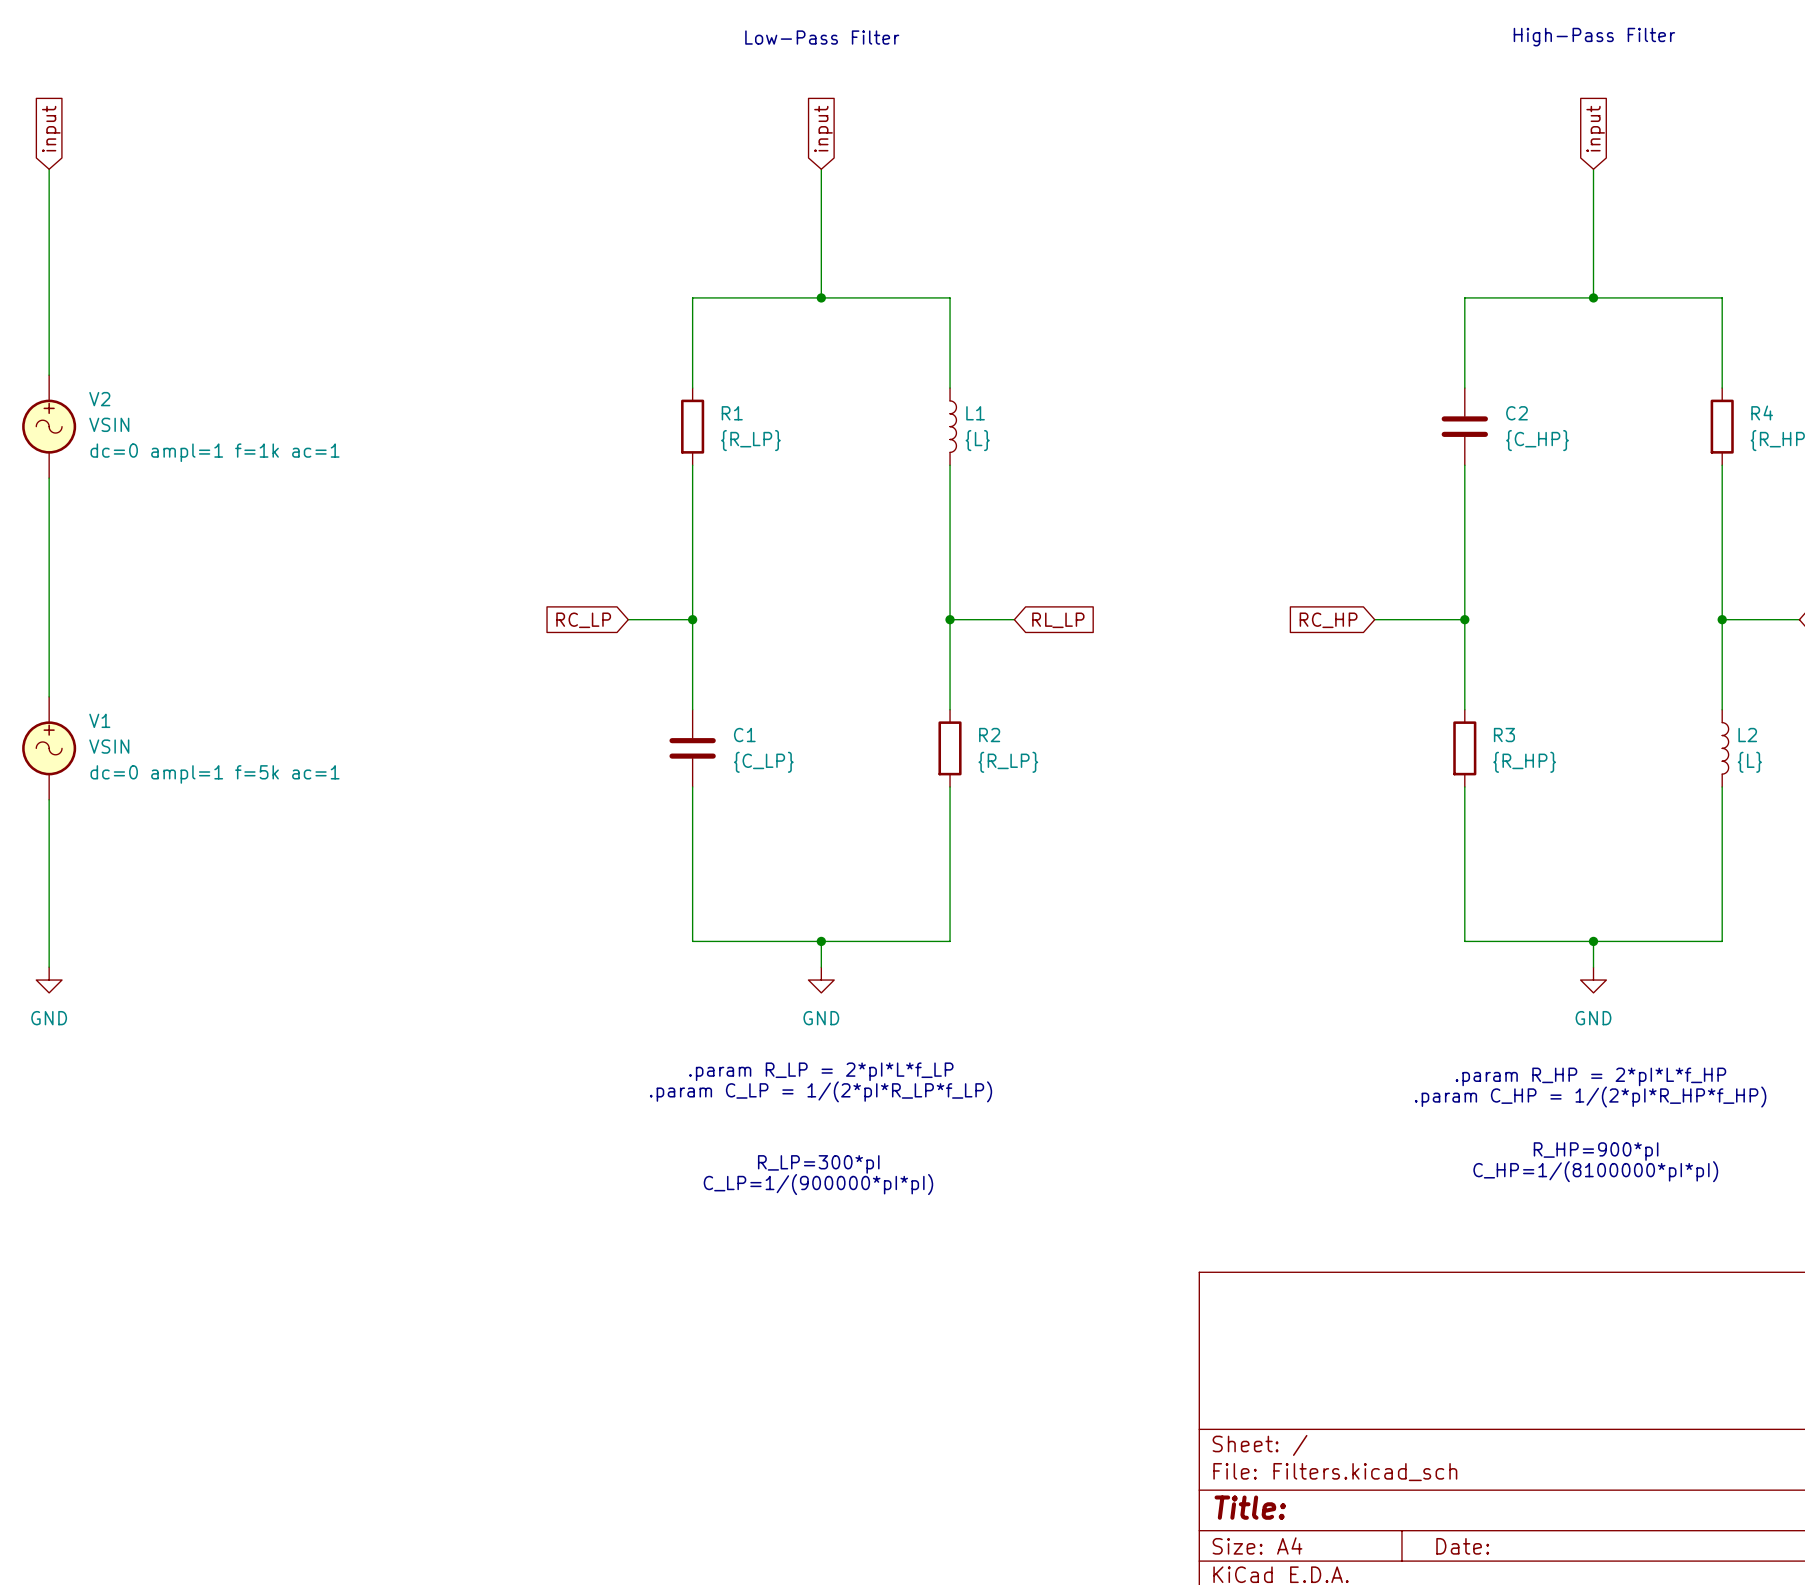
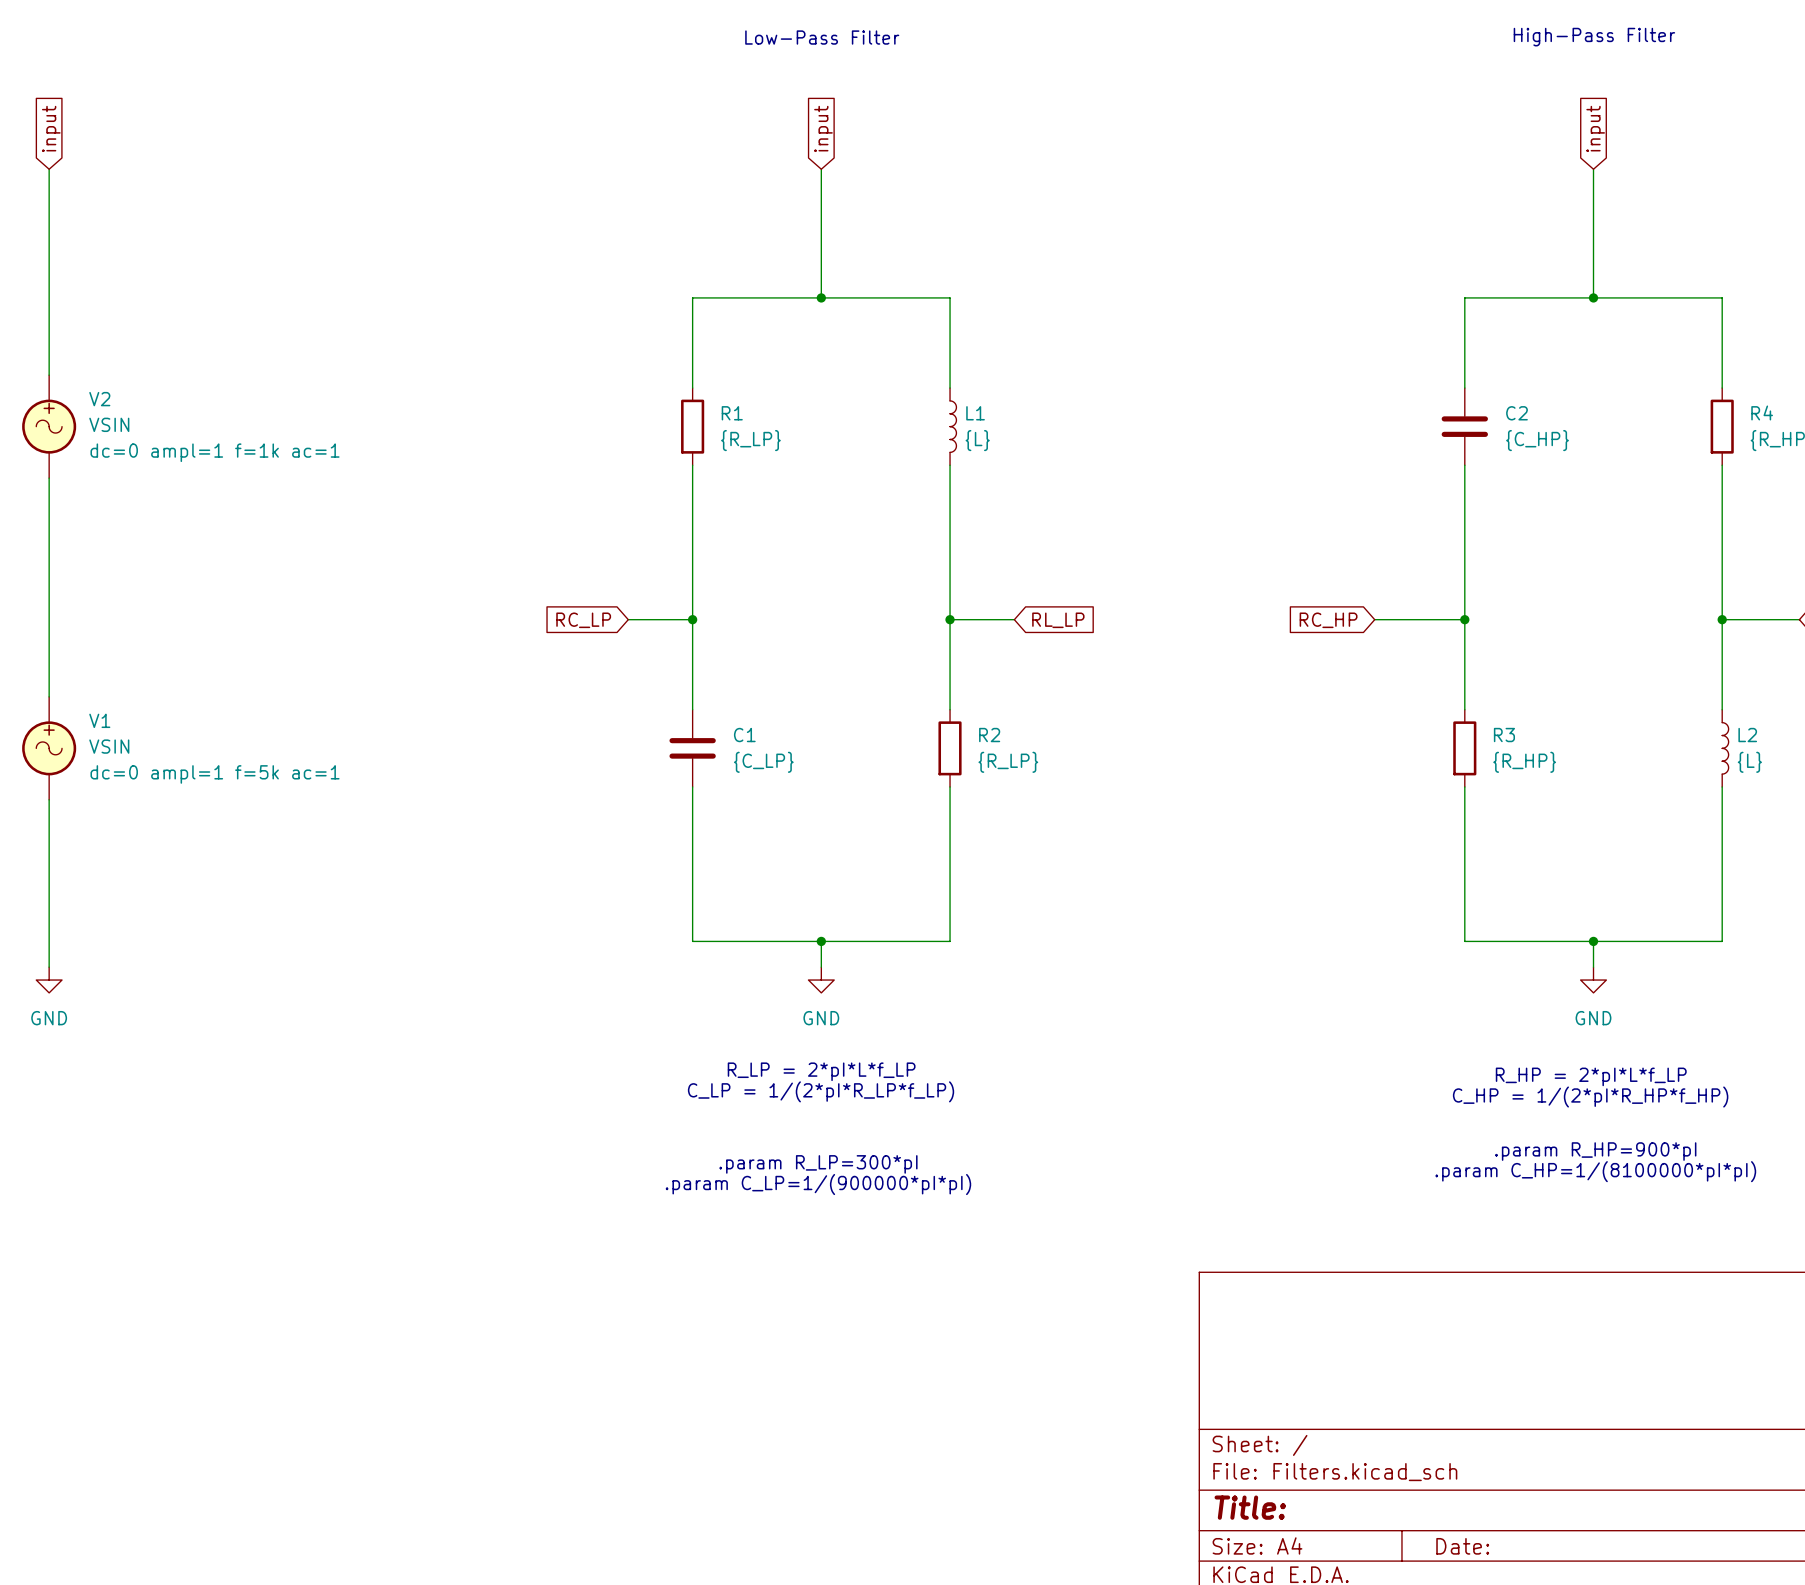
text: .param R_LP = 2*pI*L*f_LP (821, 1071) -> R_LP = 2*pI*L*f_LP (821, 1071)
text: .param R_HP = 2*pI*L*f_HP (1590, 1076) -> R_HP = 2*pI*L*f_LP (1591, 1076)
text: .param C_LP = 1/(2*pI*R_LP*f_LP) (821, 1091) -> C_LP = 1/(2*pI*R_LP*f_LP) (821, 1091)
text: .param C_HP = 1/(2*pI*R_HP*f_HP) (1590, 1097) -> C_HP = 1/(2*pI*R_HP*f_HP) (1590, 1097)
text: R_HP=900*pI (1596, 1151) -> .param R_HP=900*pI (1595, 1151)
text: R_LP=300*pI (818, 1164) -> .param R_LP=300*pI (818, 1164)
text: C_HP=1/(8100000*pI*pI) (1595, 1171) -> .param C_HP=1/(8100000*pI*pI) (1595, 1171)
text: C_LP=1/(900000*pI*pI) (818, 1184) -> .param C_LP=1/(900000*pI*pI) (818, 1184)

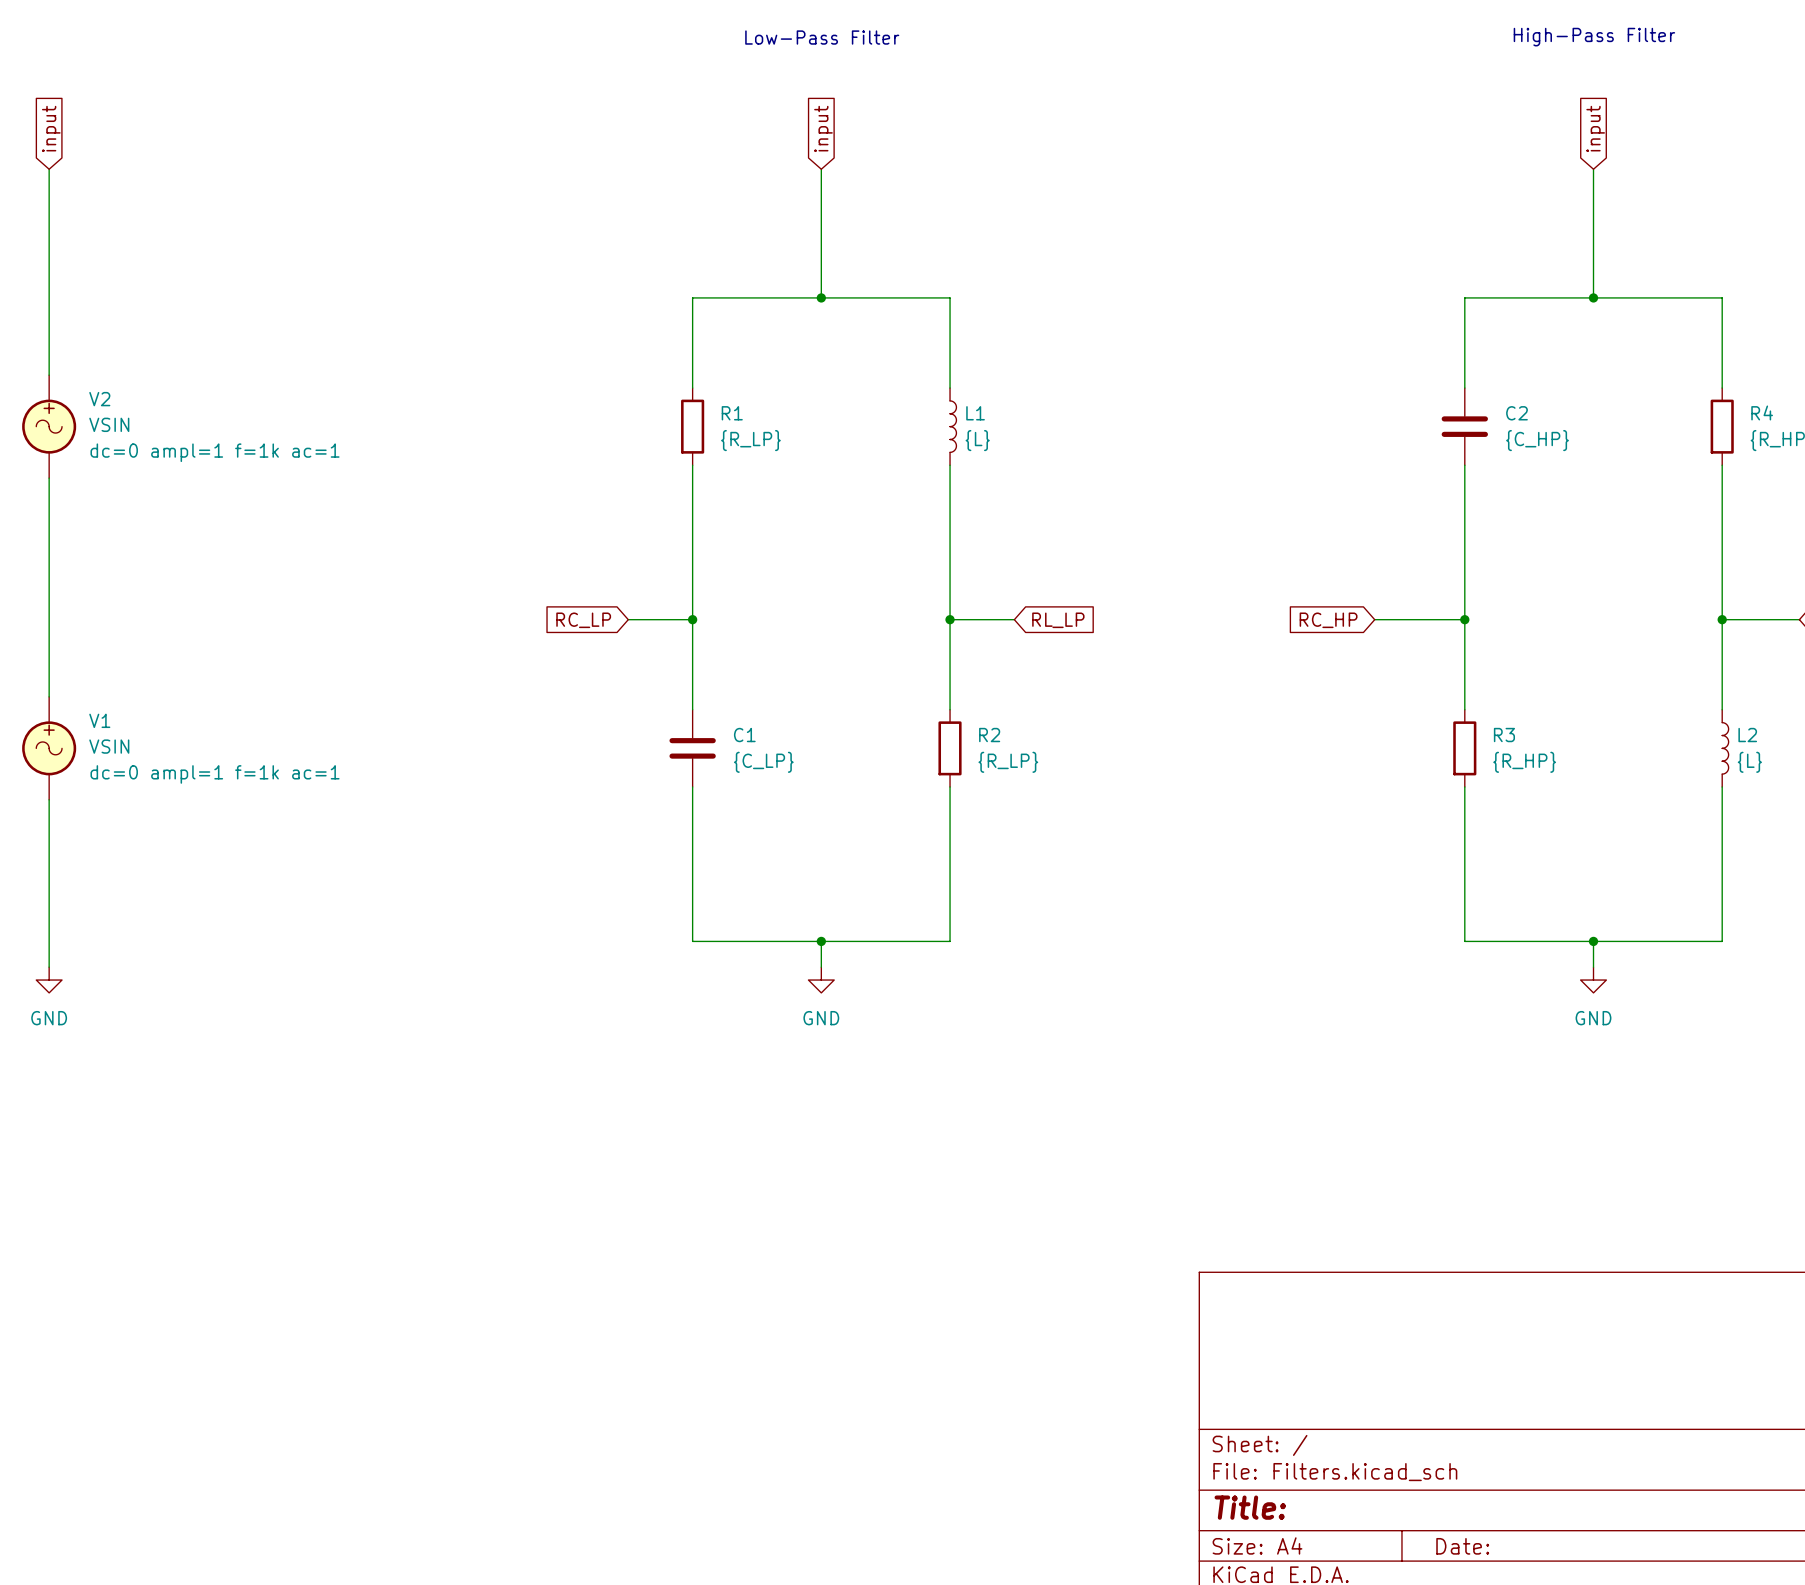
V1 text: dc=0 ampl=1 f=5k ac=1 (215, 774) -> dc=0 ampl=1 f=1k ac=1 (215, 774)
text: R_LP = 2*pI*L*f_LP (821, 1071) -> none
text: R_HP = 2*pI*L*f_LP (1591, 1076) -> none
text: C_LP = 1/(2*pI*R_LP*f_LP) (821, 1091) -> none
text: C_HP = 1/(2*pI*R_HP*f_HP) (1590, 1097) -> none
text: .param R_HP=900*pI (1595, 1151) -> none
text: .param R_LP=300*pI (818, 1164) -> none
text: .param C_HP=1/(8100000*pI*pI) (1595, 1171) -> none
text: .param C_LP=1/(900000*pI*pI) (818, 1184) -> none

